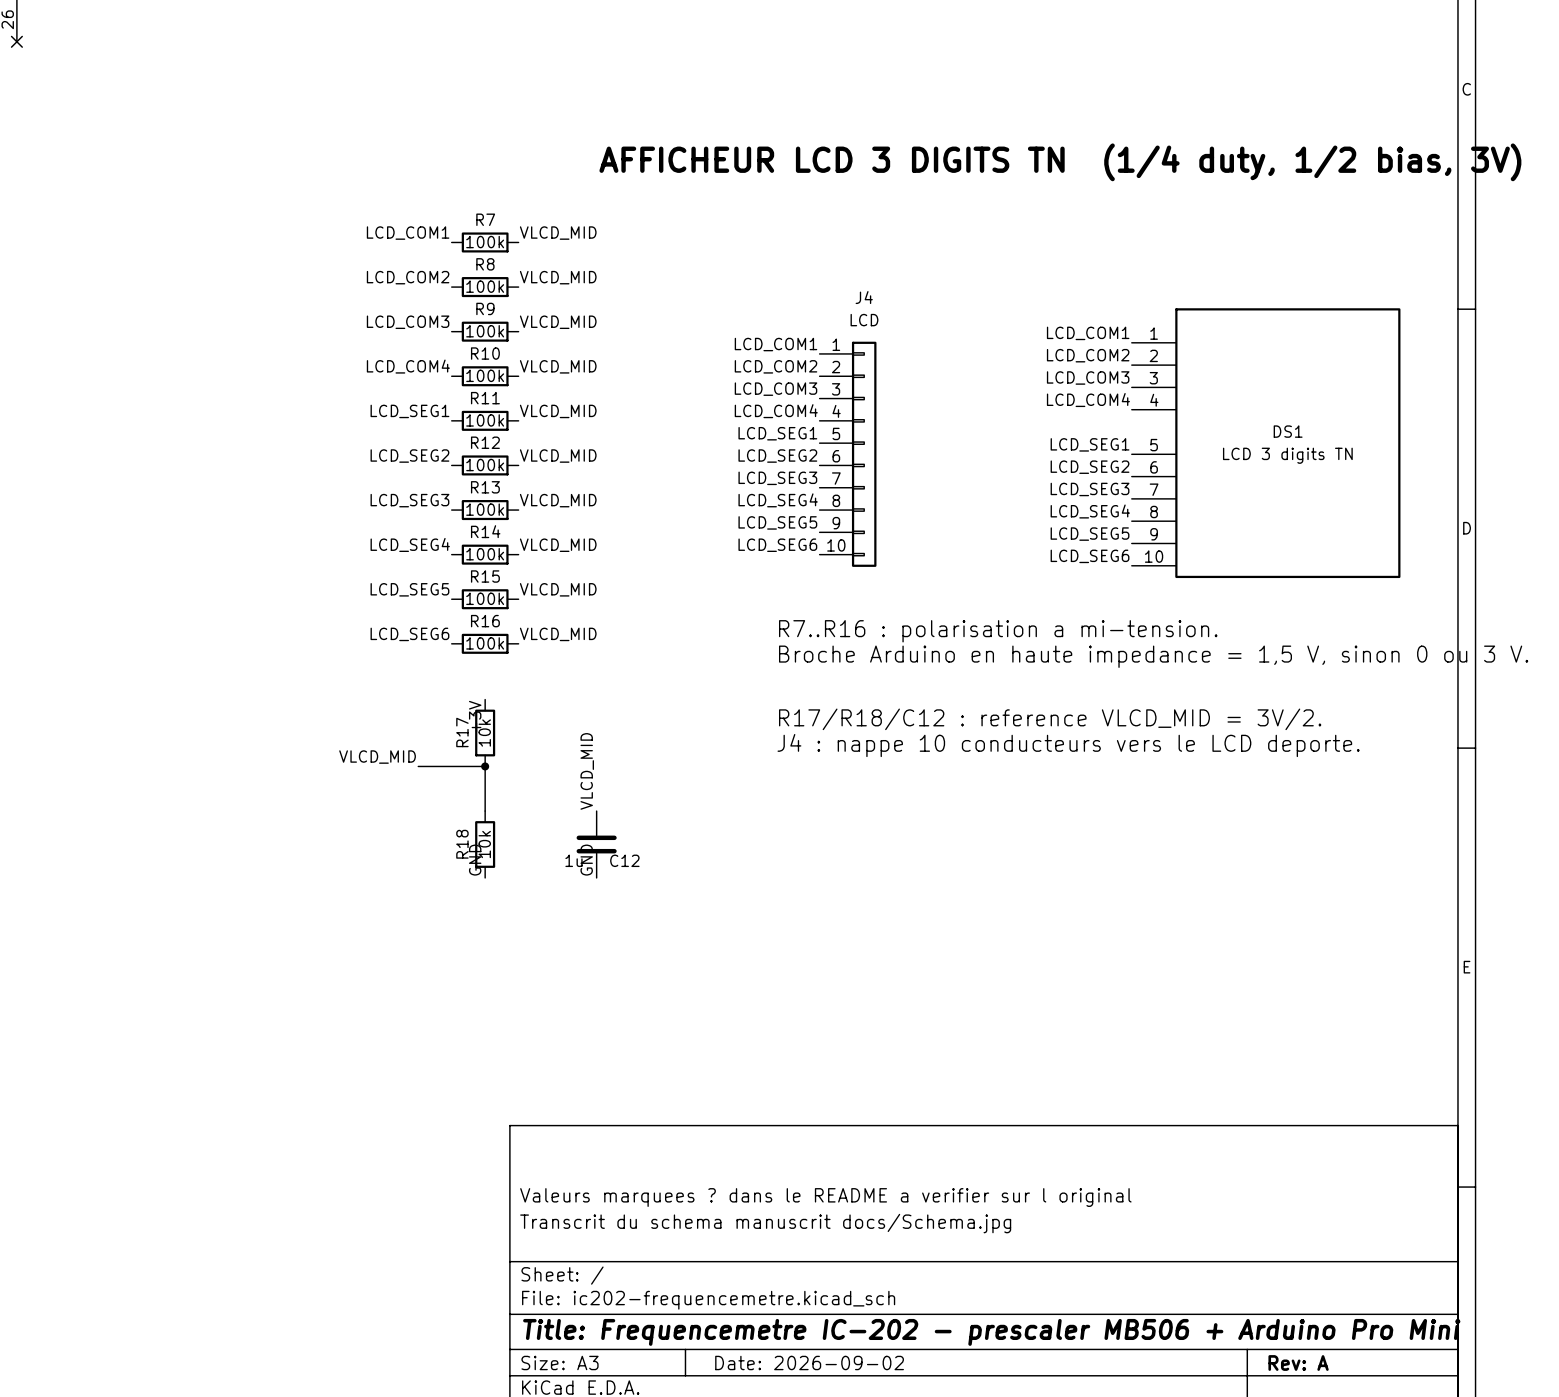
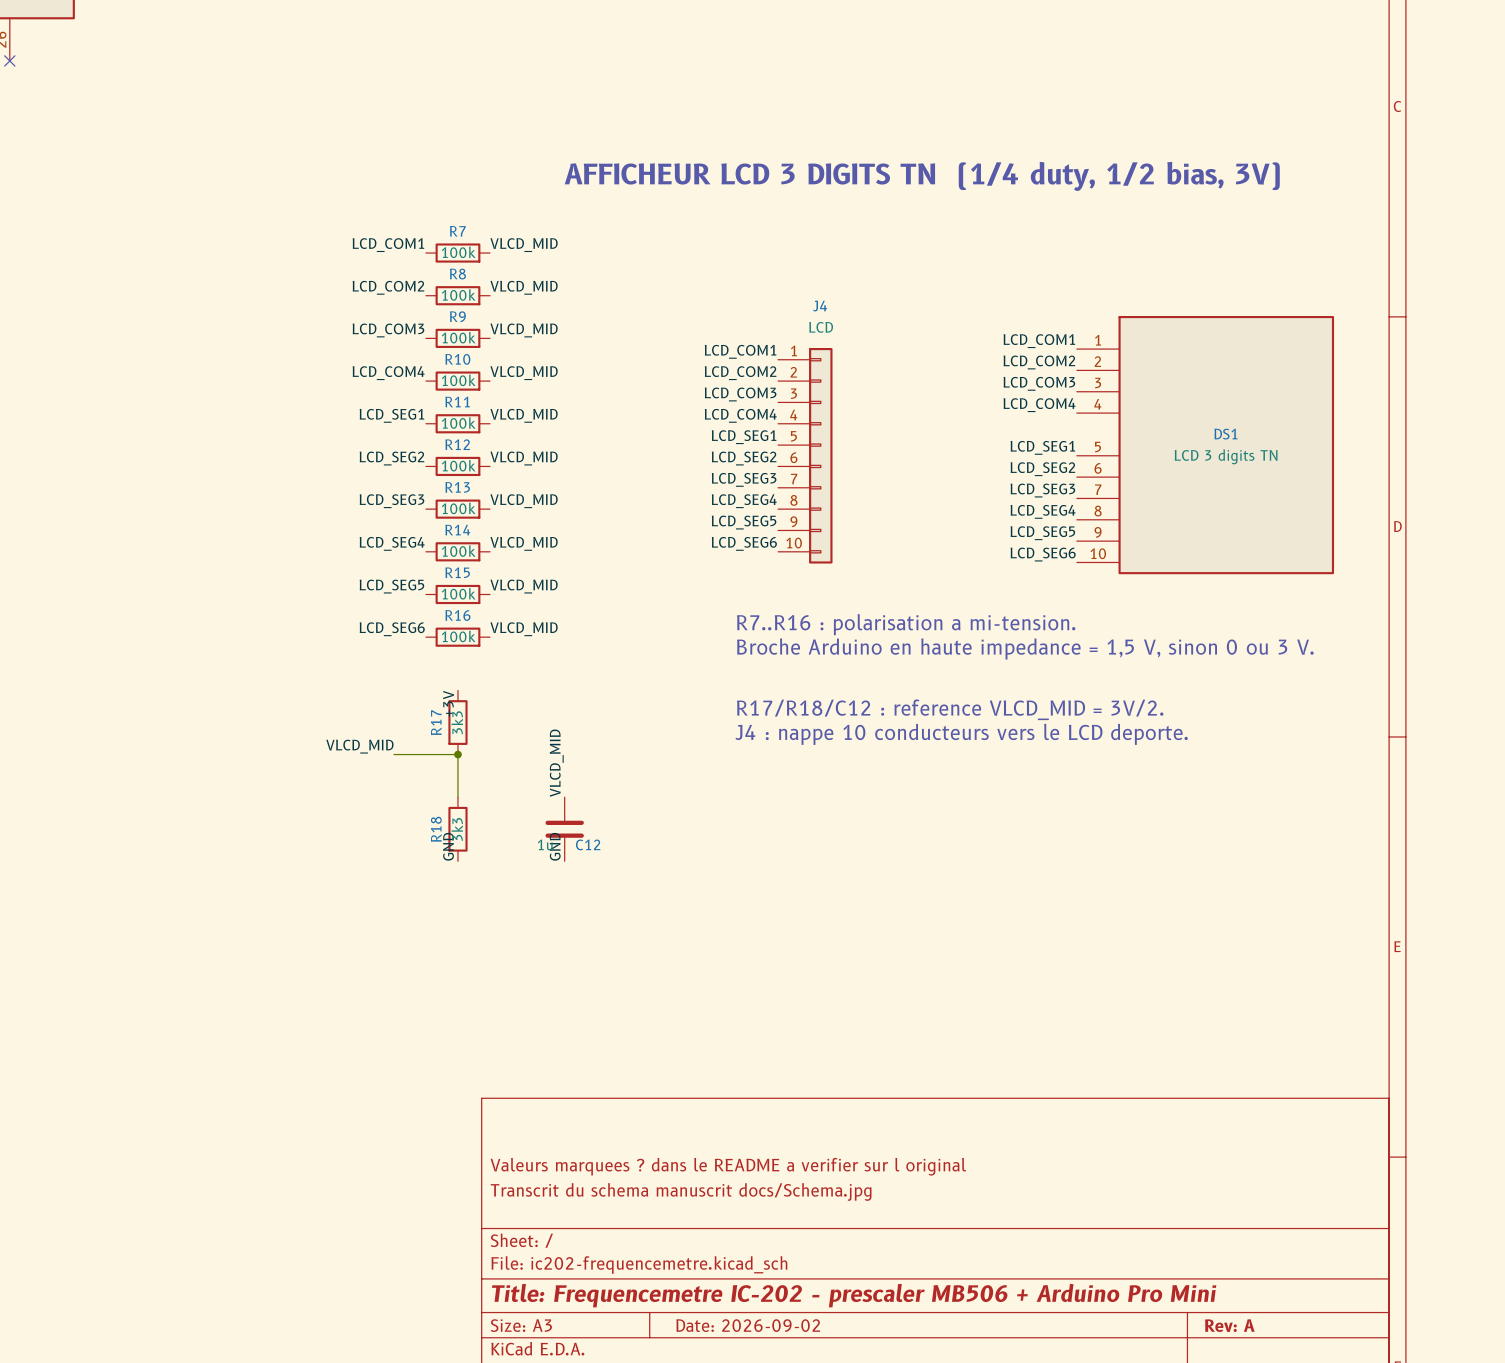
R17 value: 10k (484, 733) -> 3k3 (457, 722)
R18 value: 10k (484, 844) -> 3k3 (457, 829)

